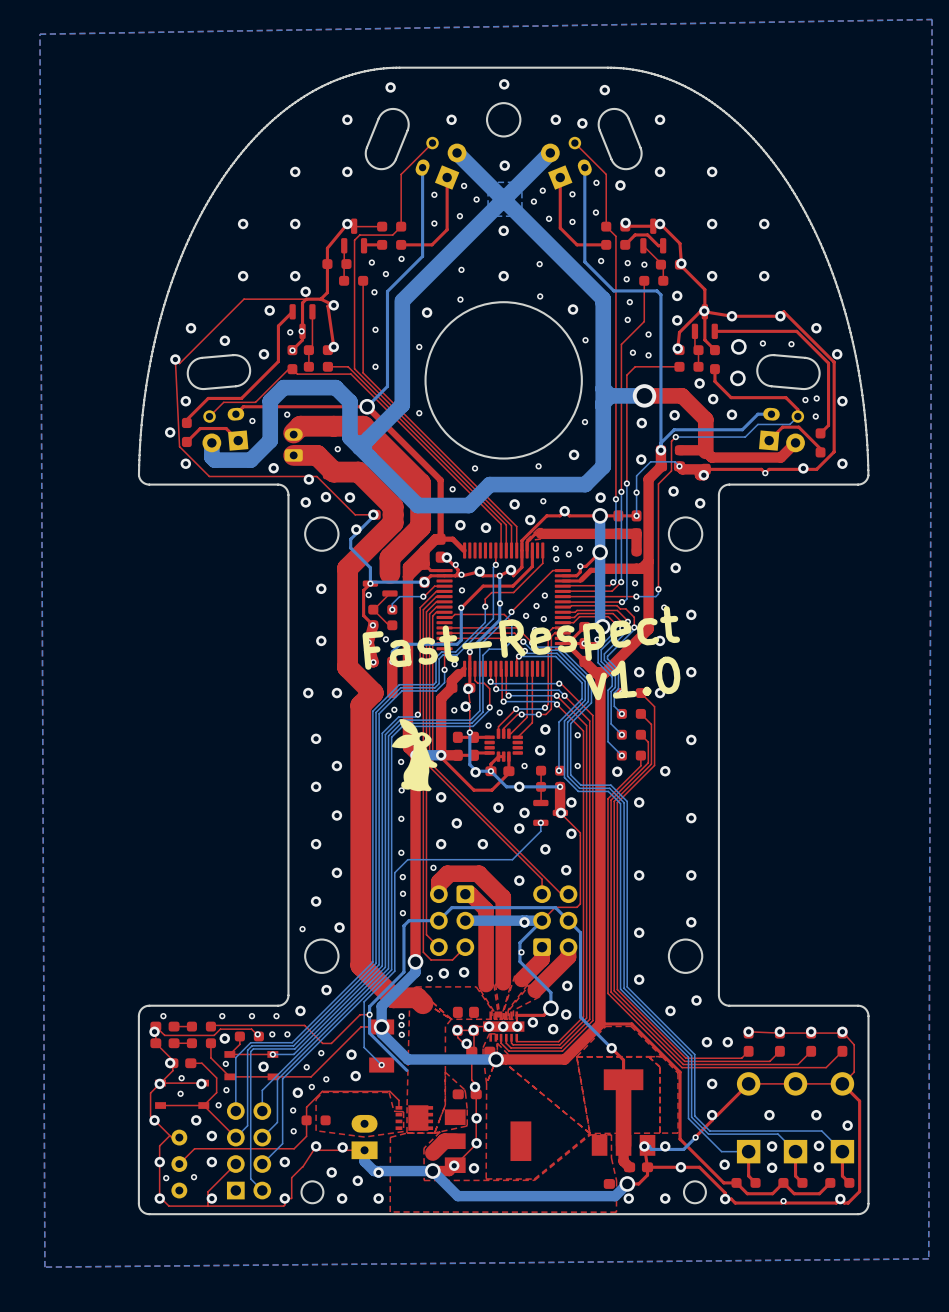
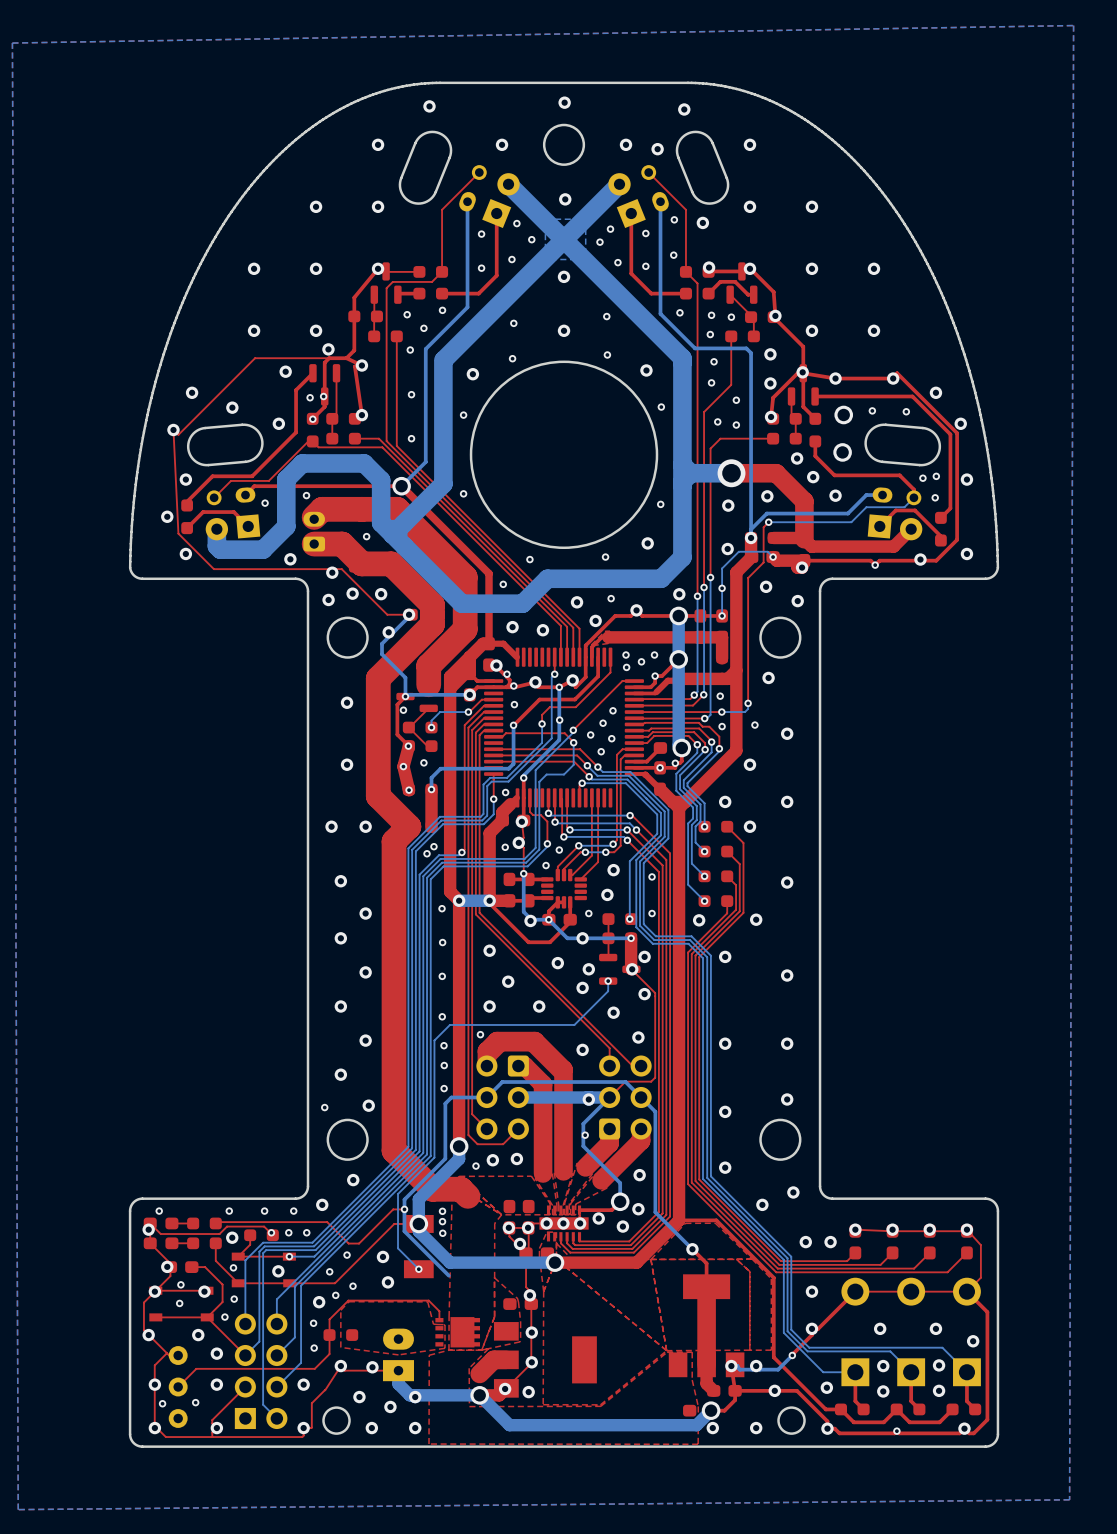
text: Fast-Respect (521, 637) -> none
text: v1.0 (633, 678) -> none
drawing: [391, 719, 438, 792] -> none

